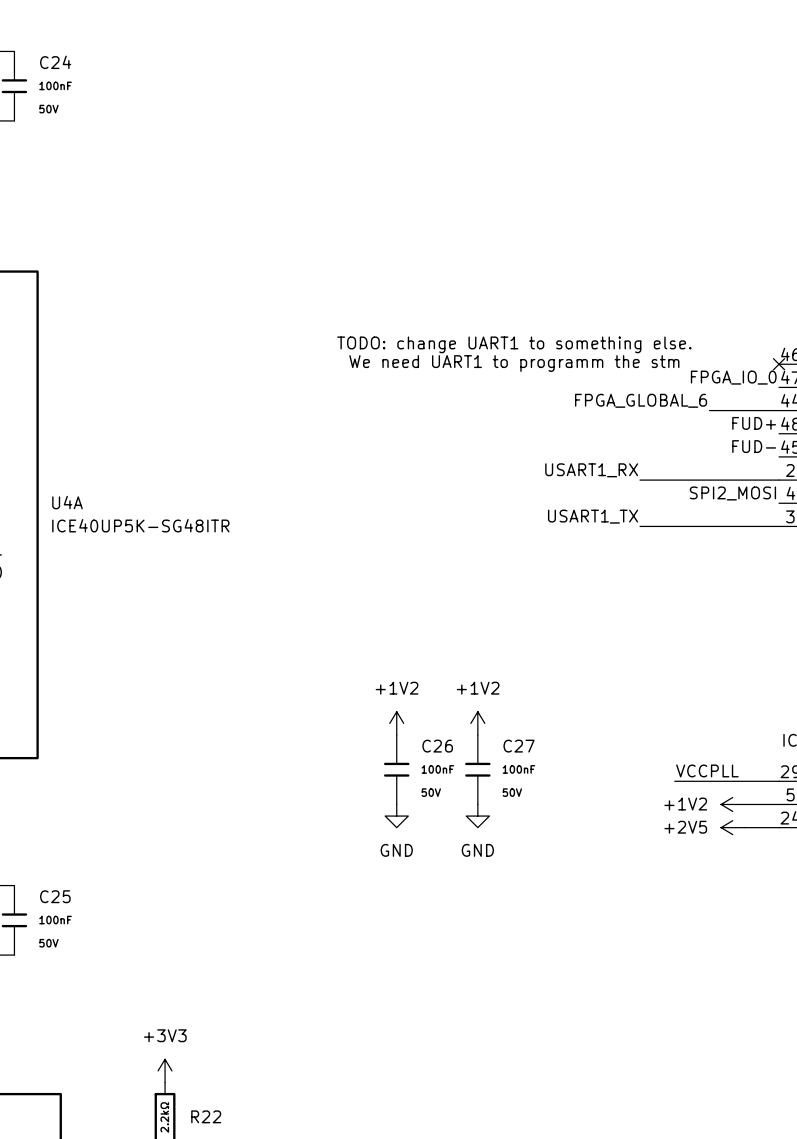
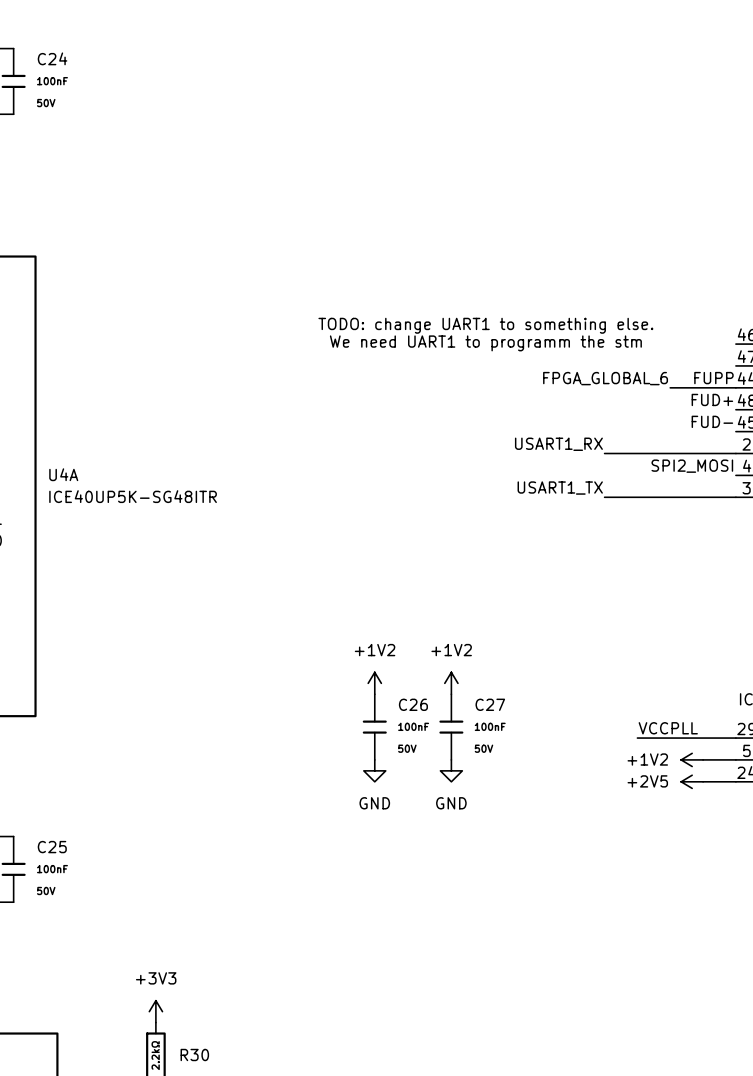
no-connect mark: (779, 364) -> none
label: FPGA_IO_0 (733, 377) -> none
label: none -> FUPP (713, 378)
R22 name: R22 (206, 1116) -> R30 (194, 1055)

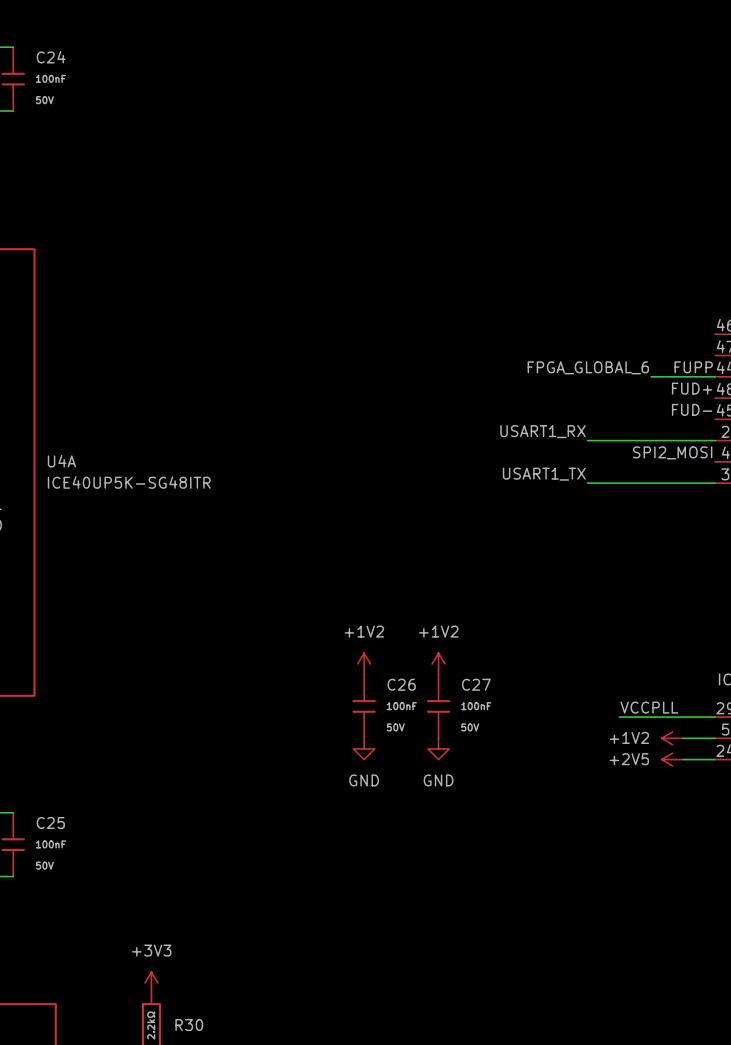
text: TODO: change UART1 to something else. (485, 325) -> none
text: We need UART1 to programm the stm (485, 343) -> none

